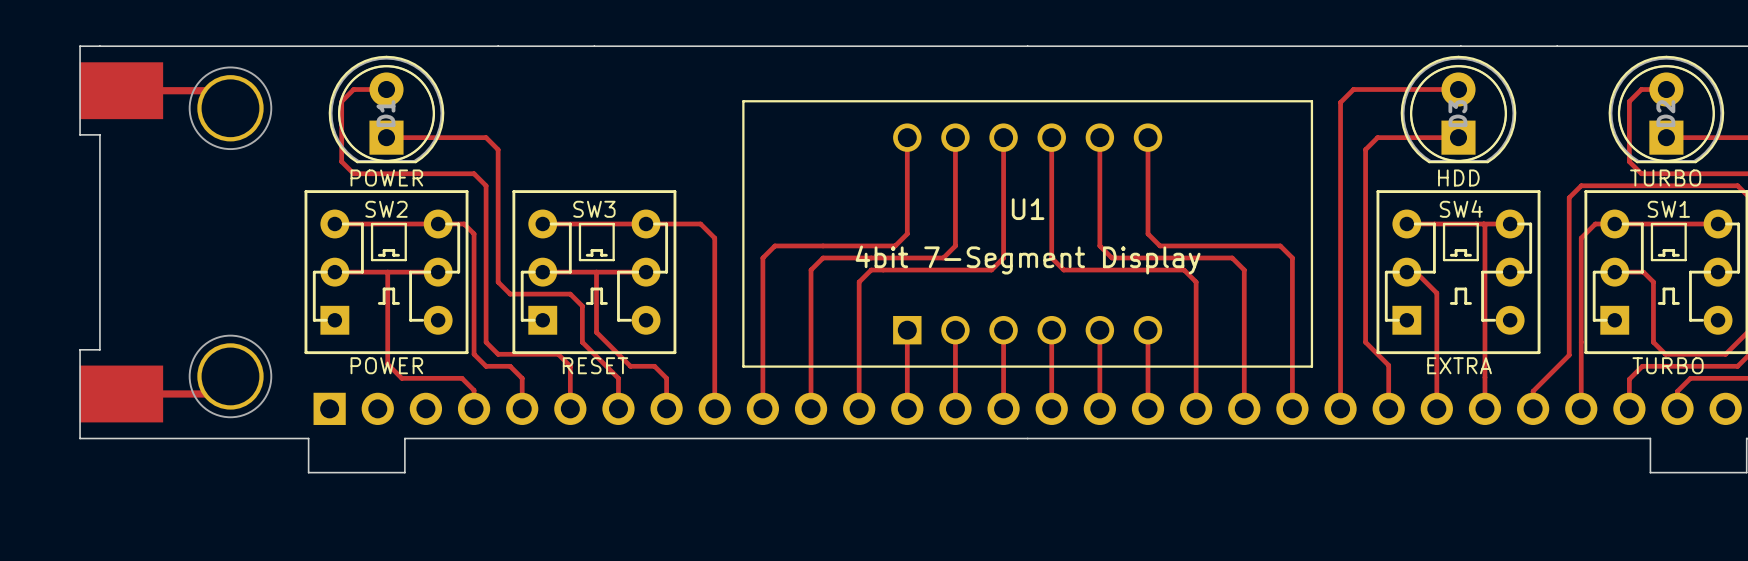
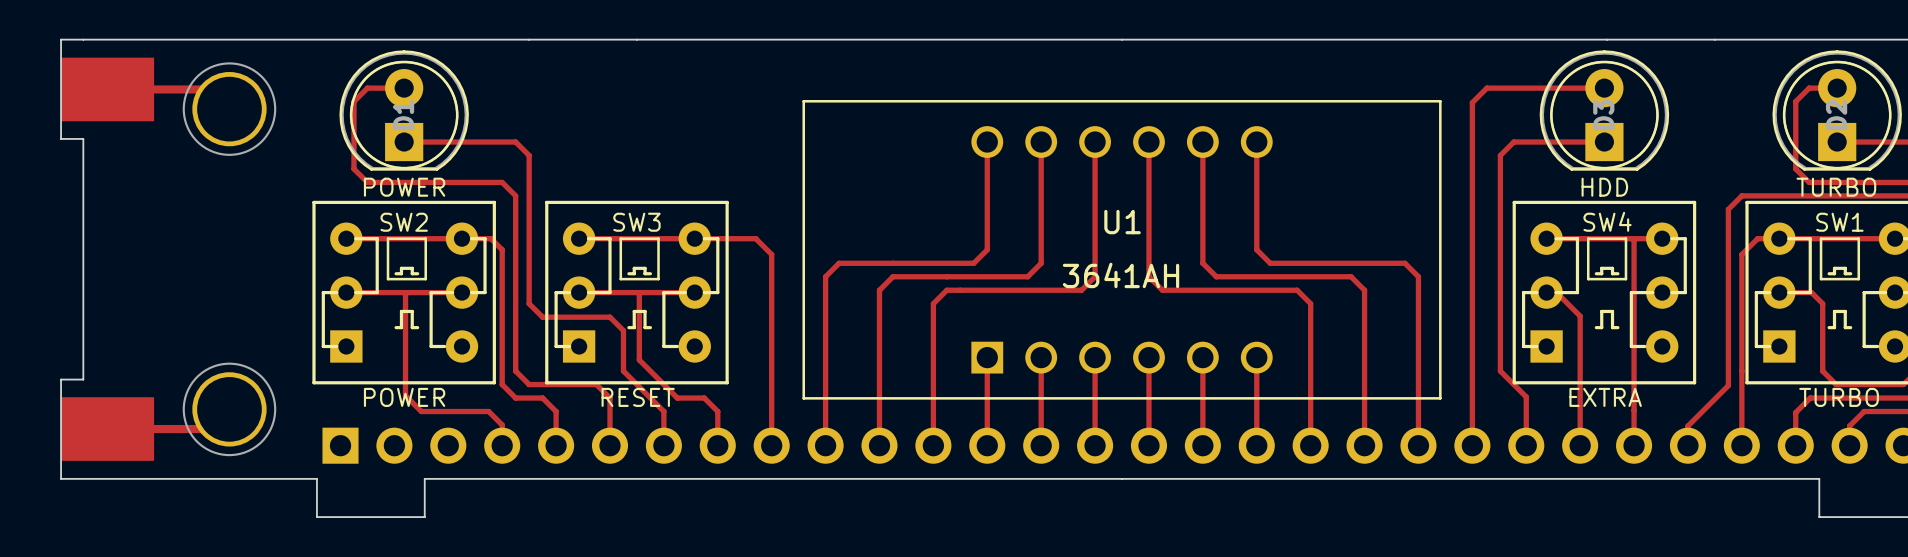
U1 value: 4bit 7-Segment Display (1028, 259) -> 3641AH (1121, 275)

